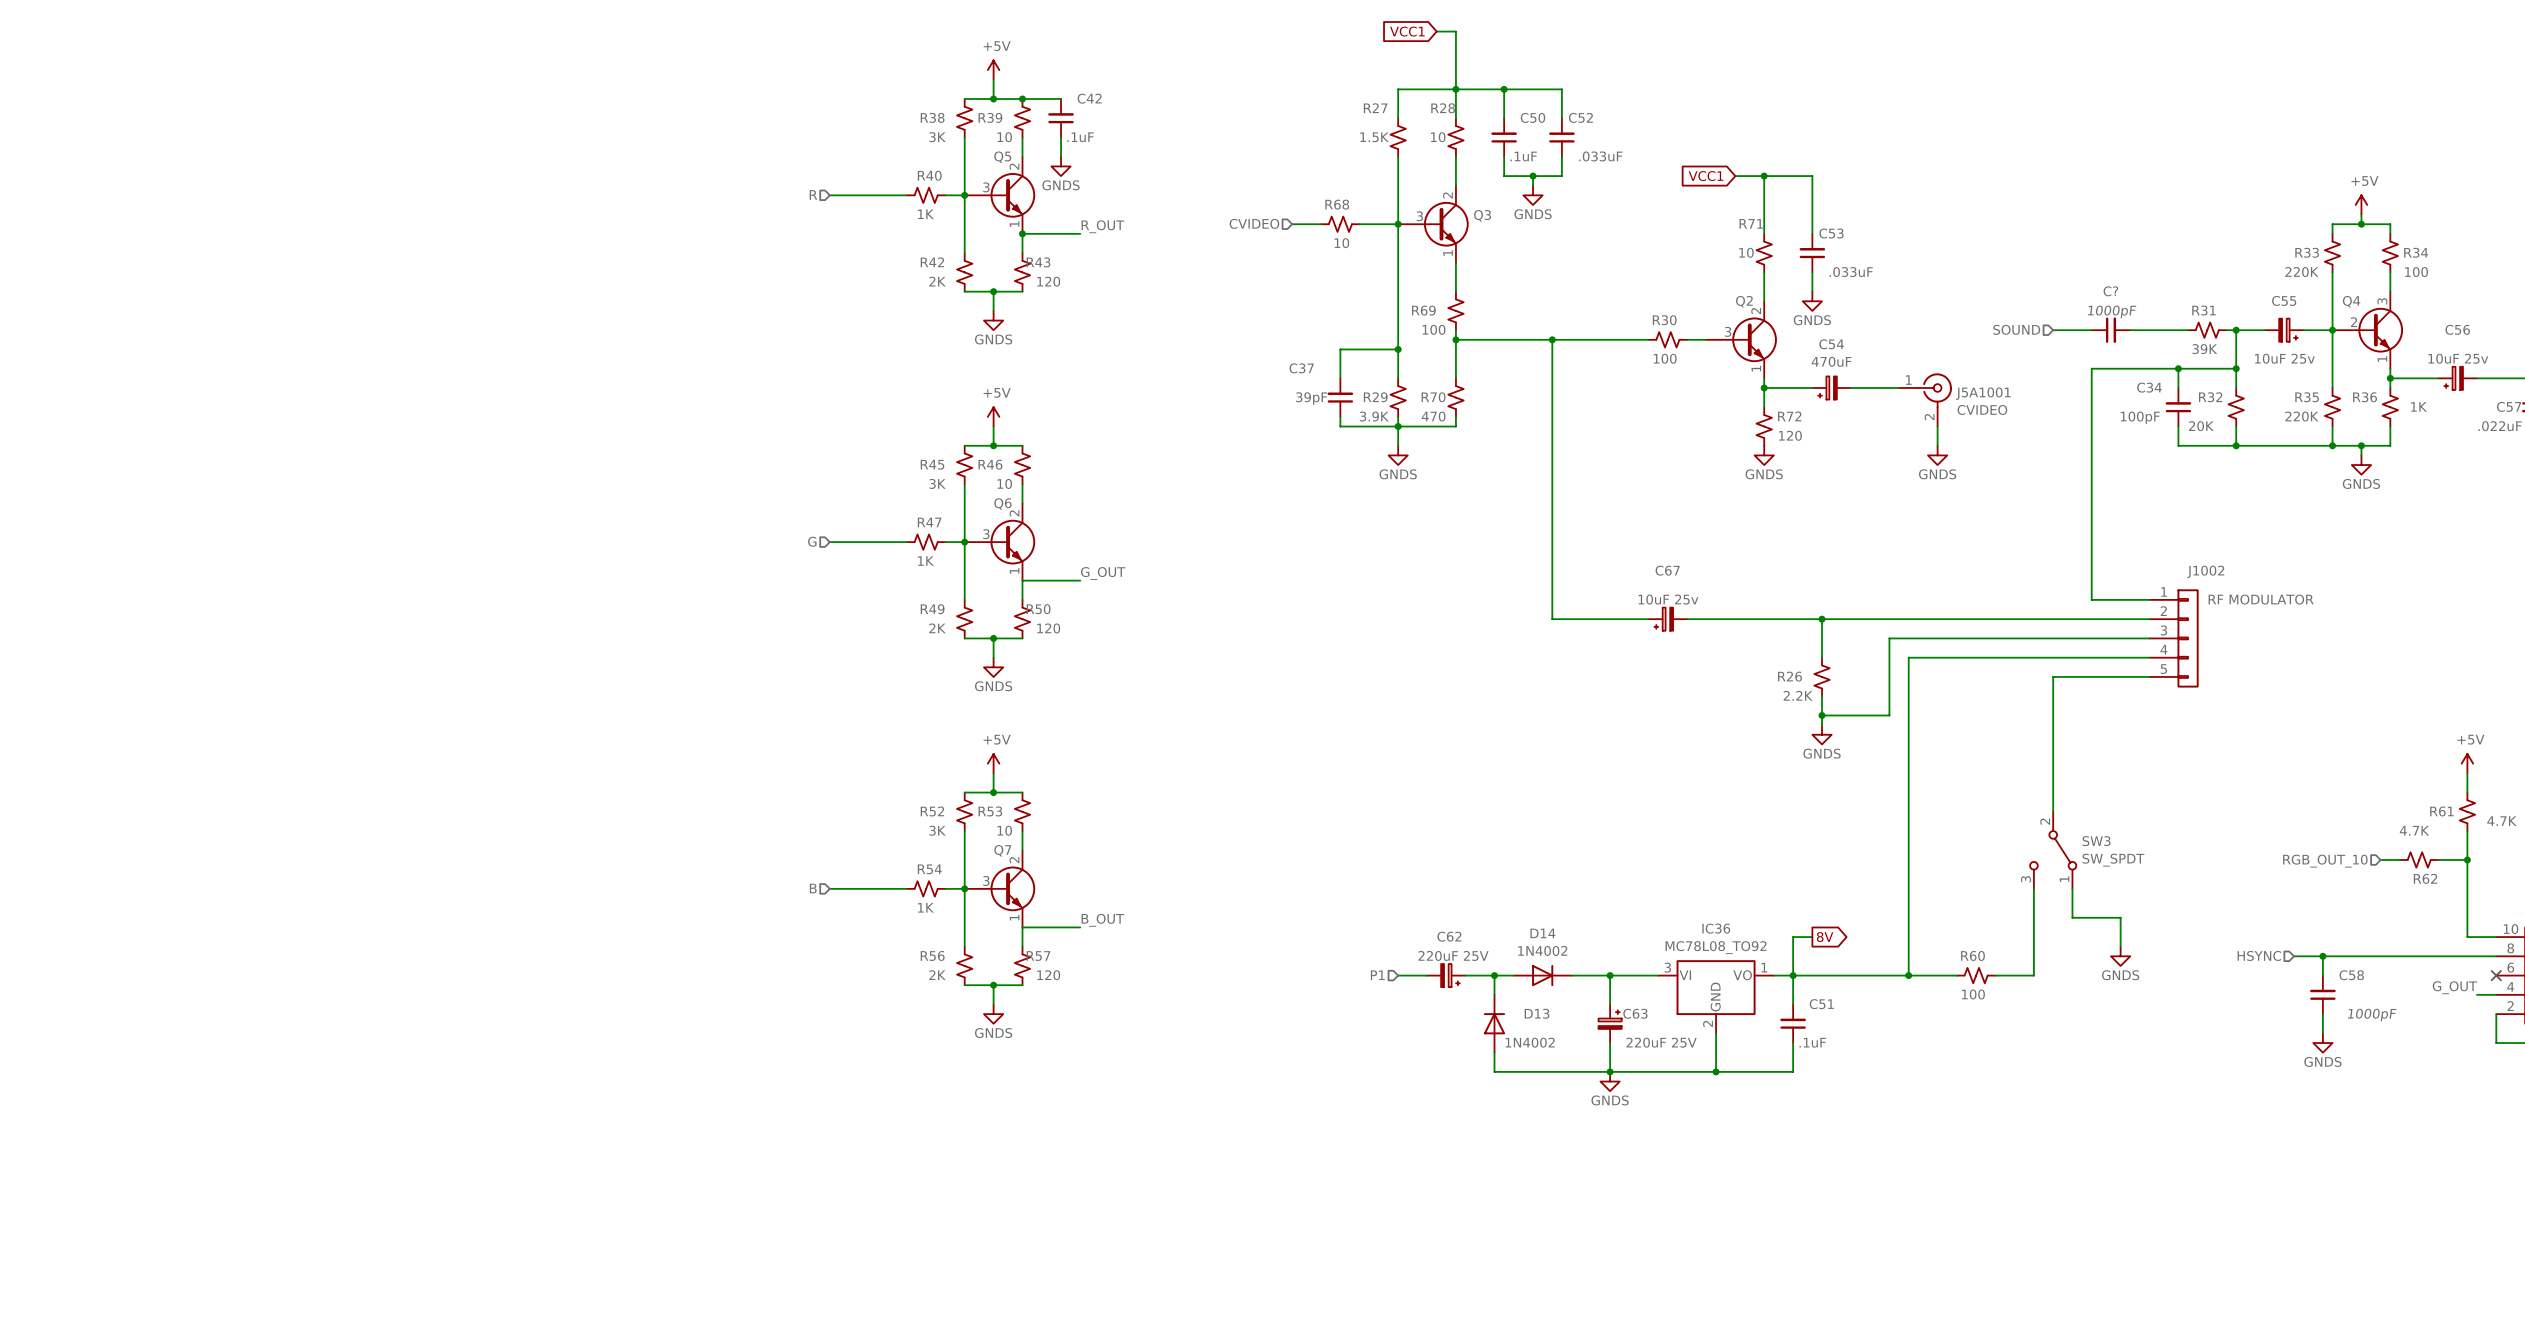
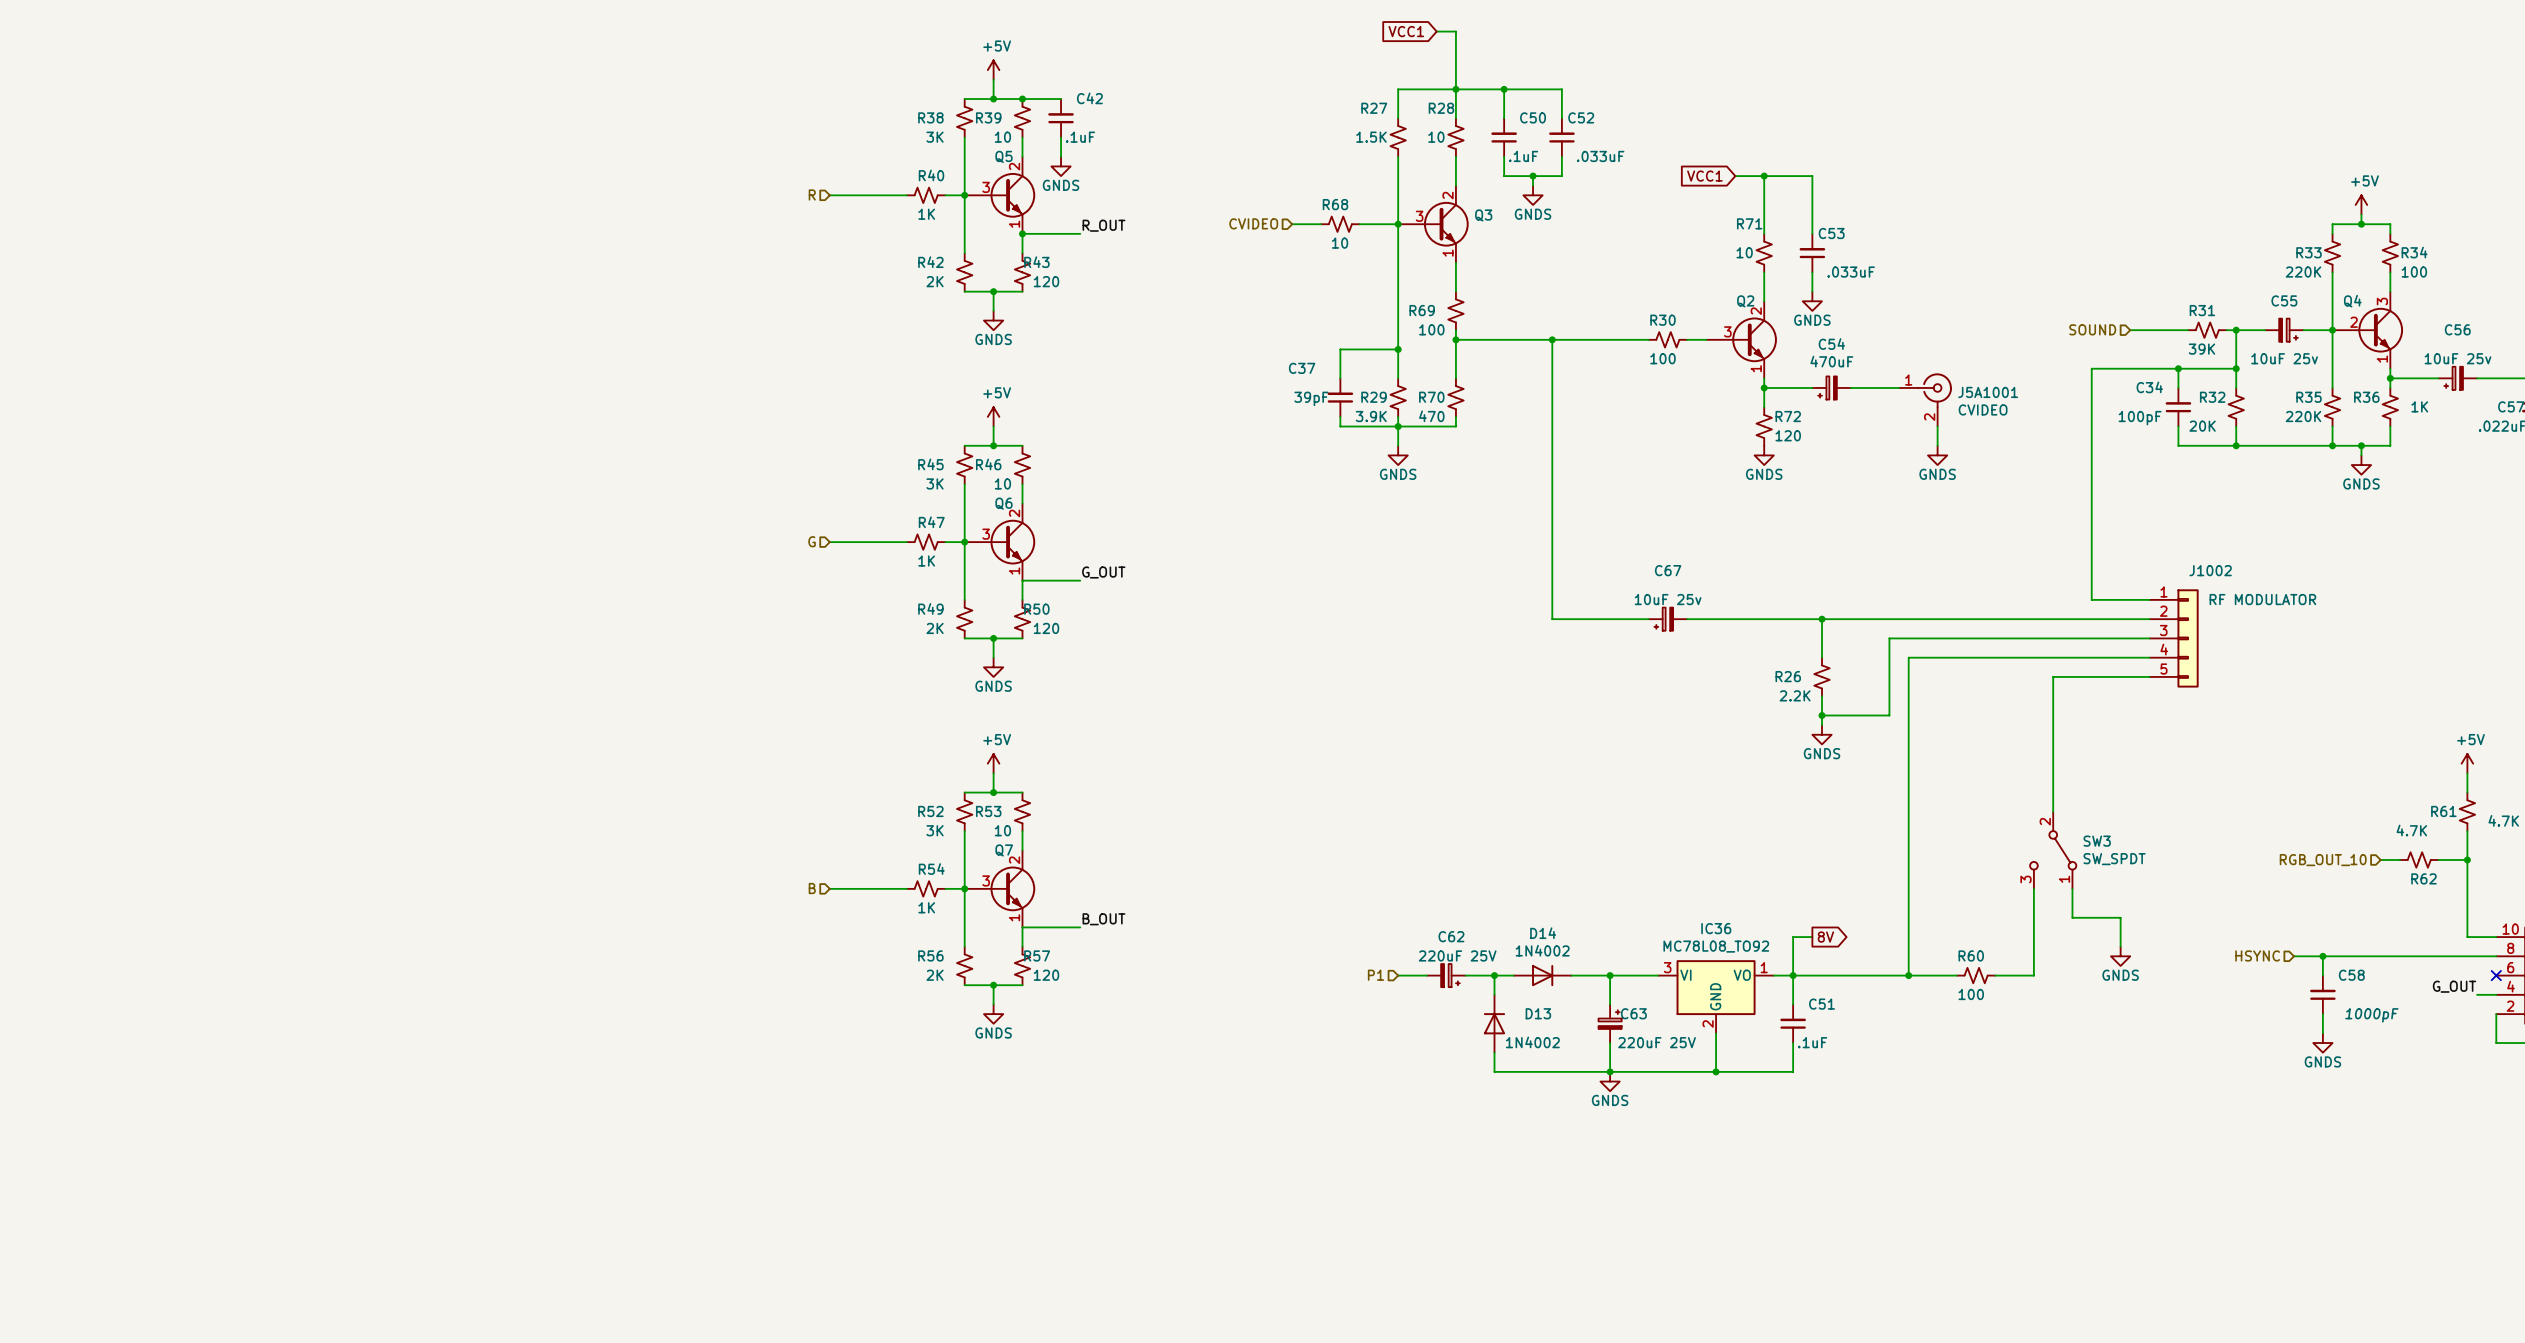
hierarchical label position: SOUND (2016, 329) -> SOUND (2092, 329)
wire: (2053, 330) (2091, 330) -> none
C?: 1000pF (2110, 330) -> none

